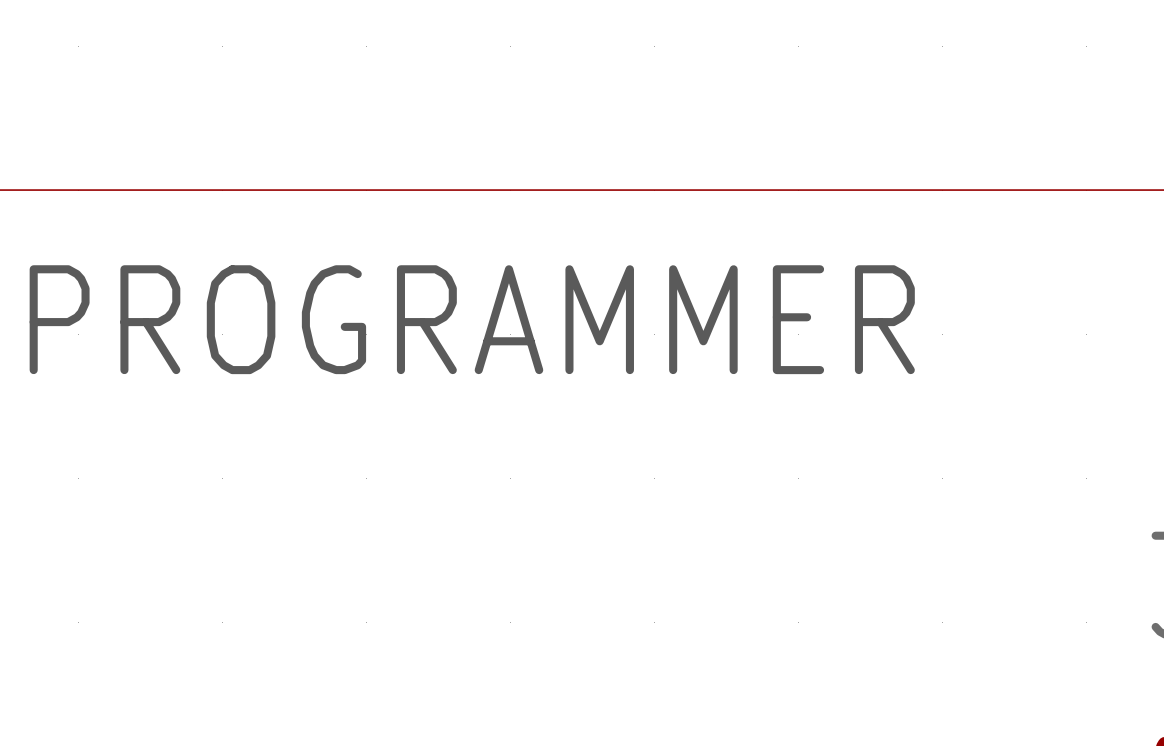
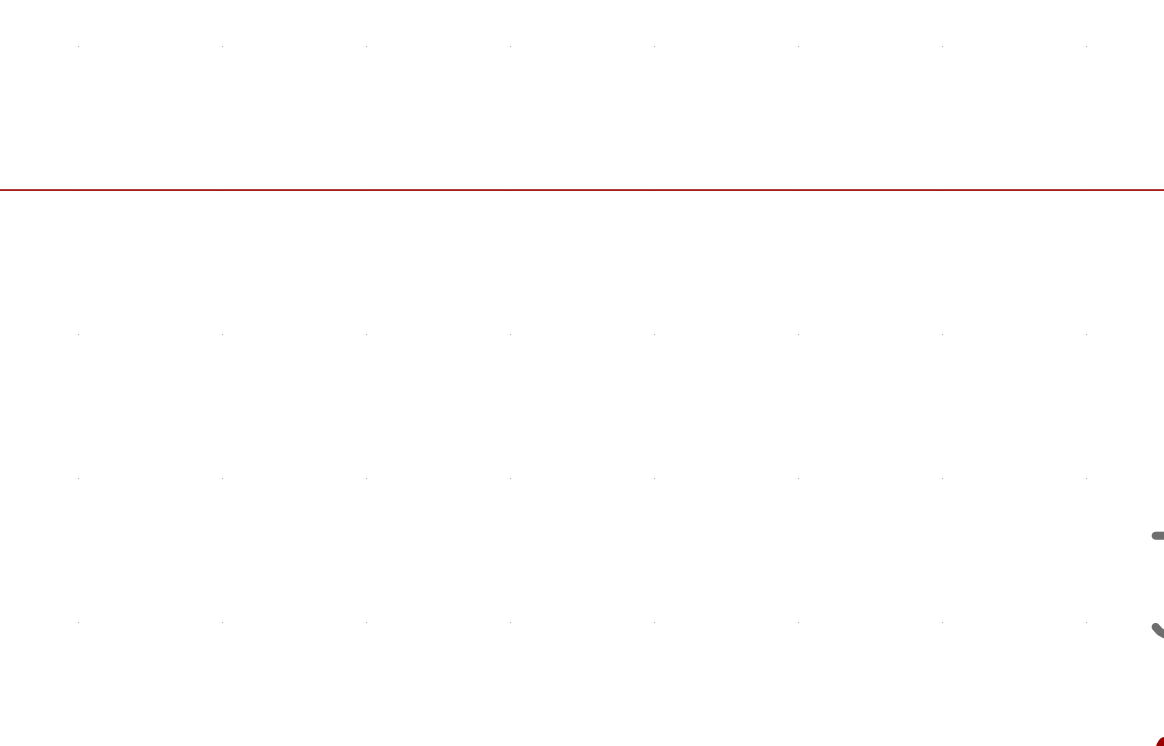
text: PROGRAMMER (472, 319) -> none

